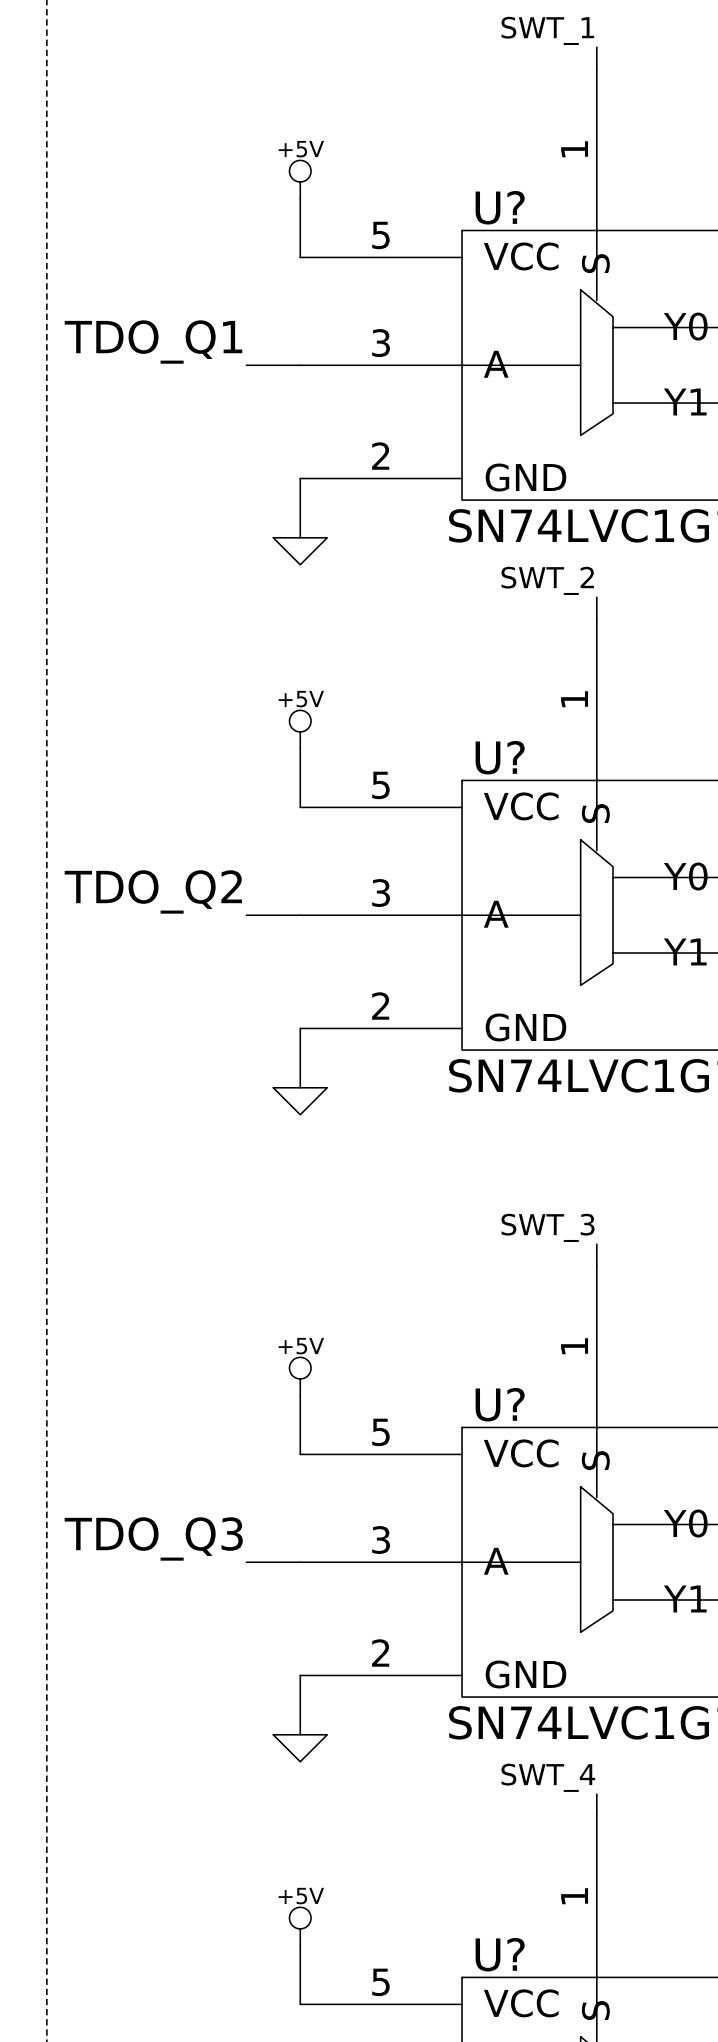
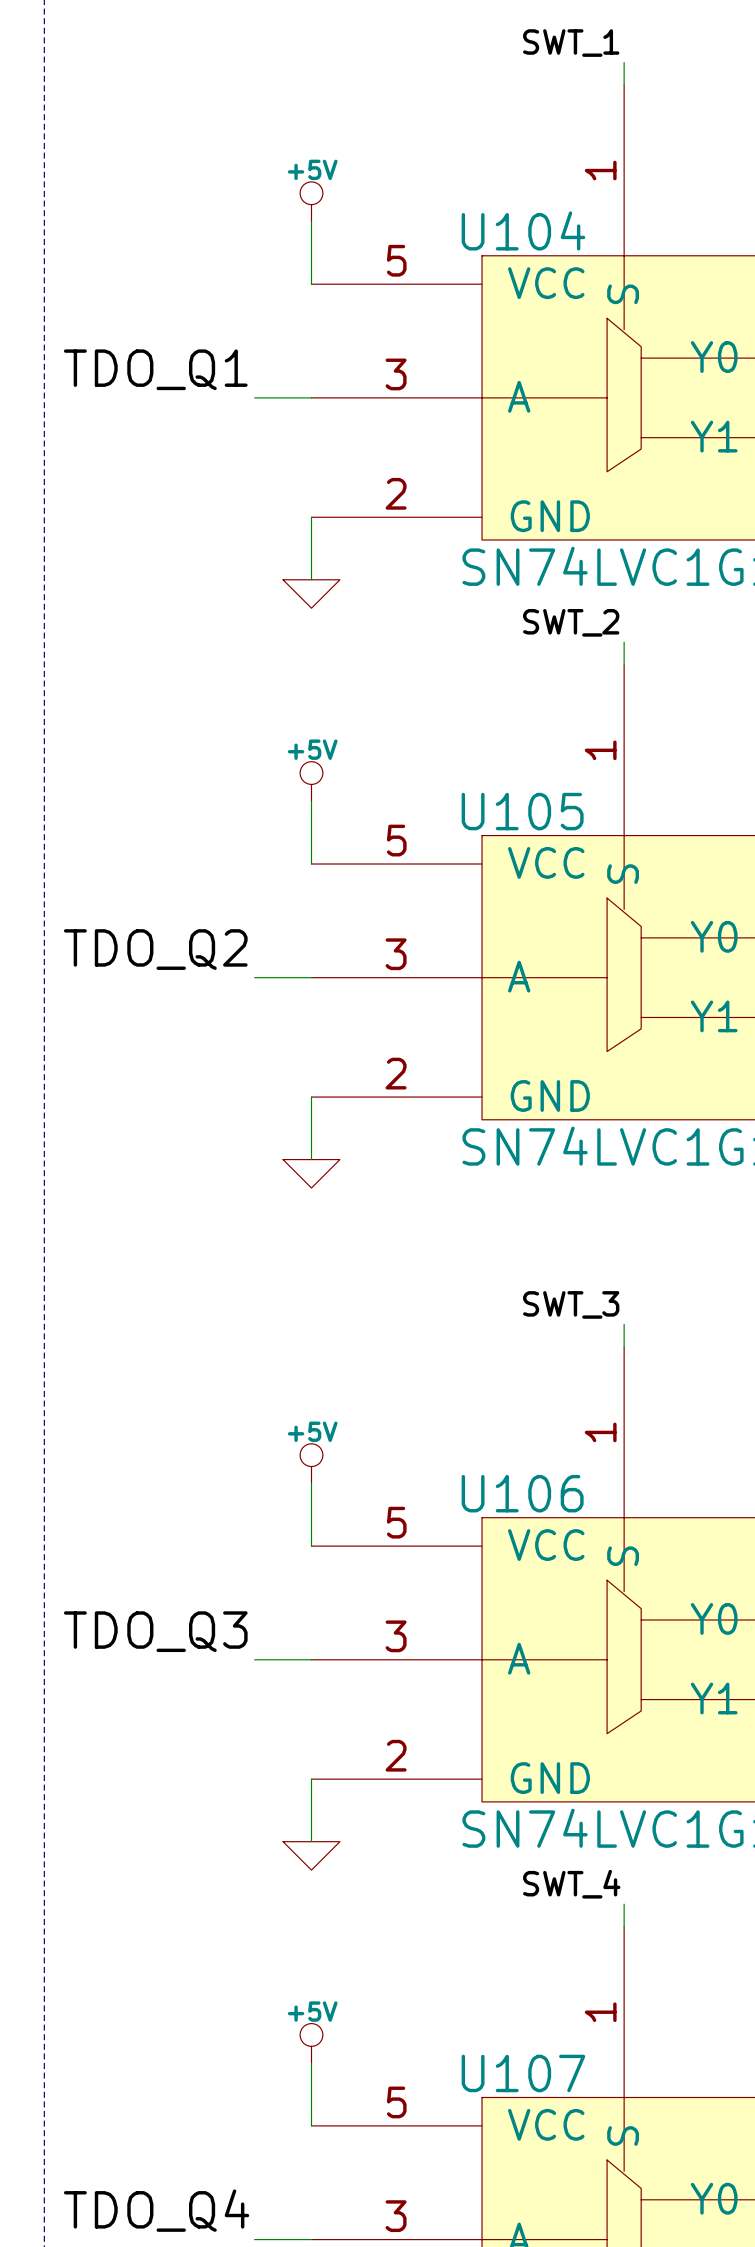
U? name: U? (500, 207) -> U104 (523, 230)
U? name: U? (500, 757) -> U105 (522, 811)
U? name: U? (500, 1404) -> U106 (522, 1493)
U? name: U? (500, 1954) -> U107 (523, 2073)

